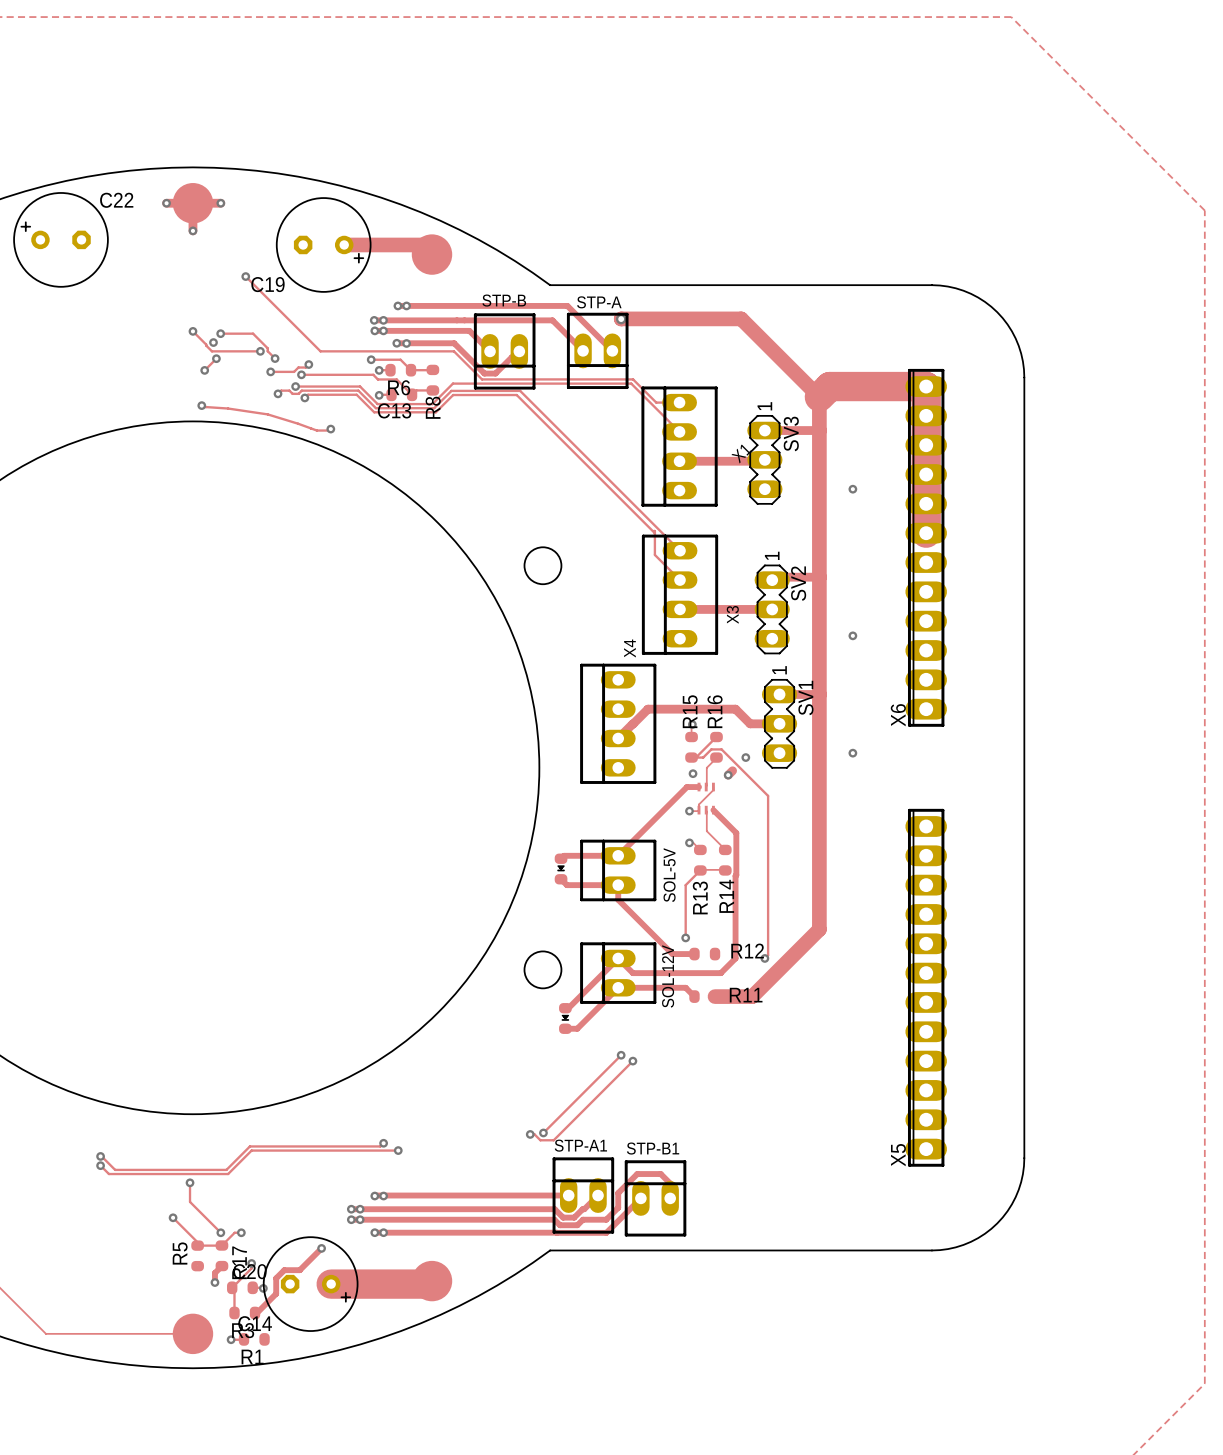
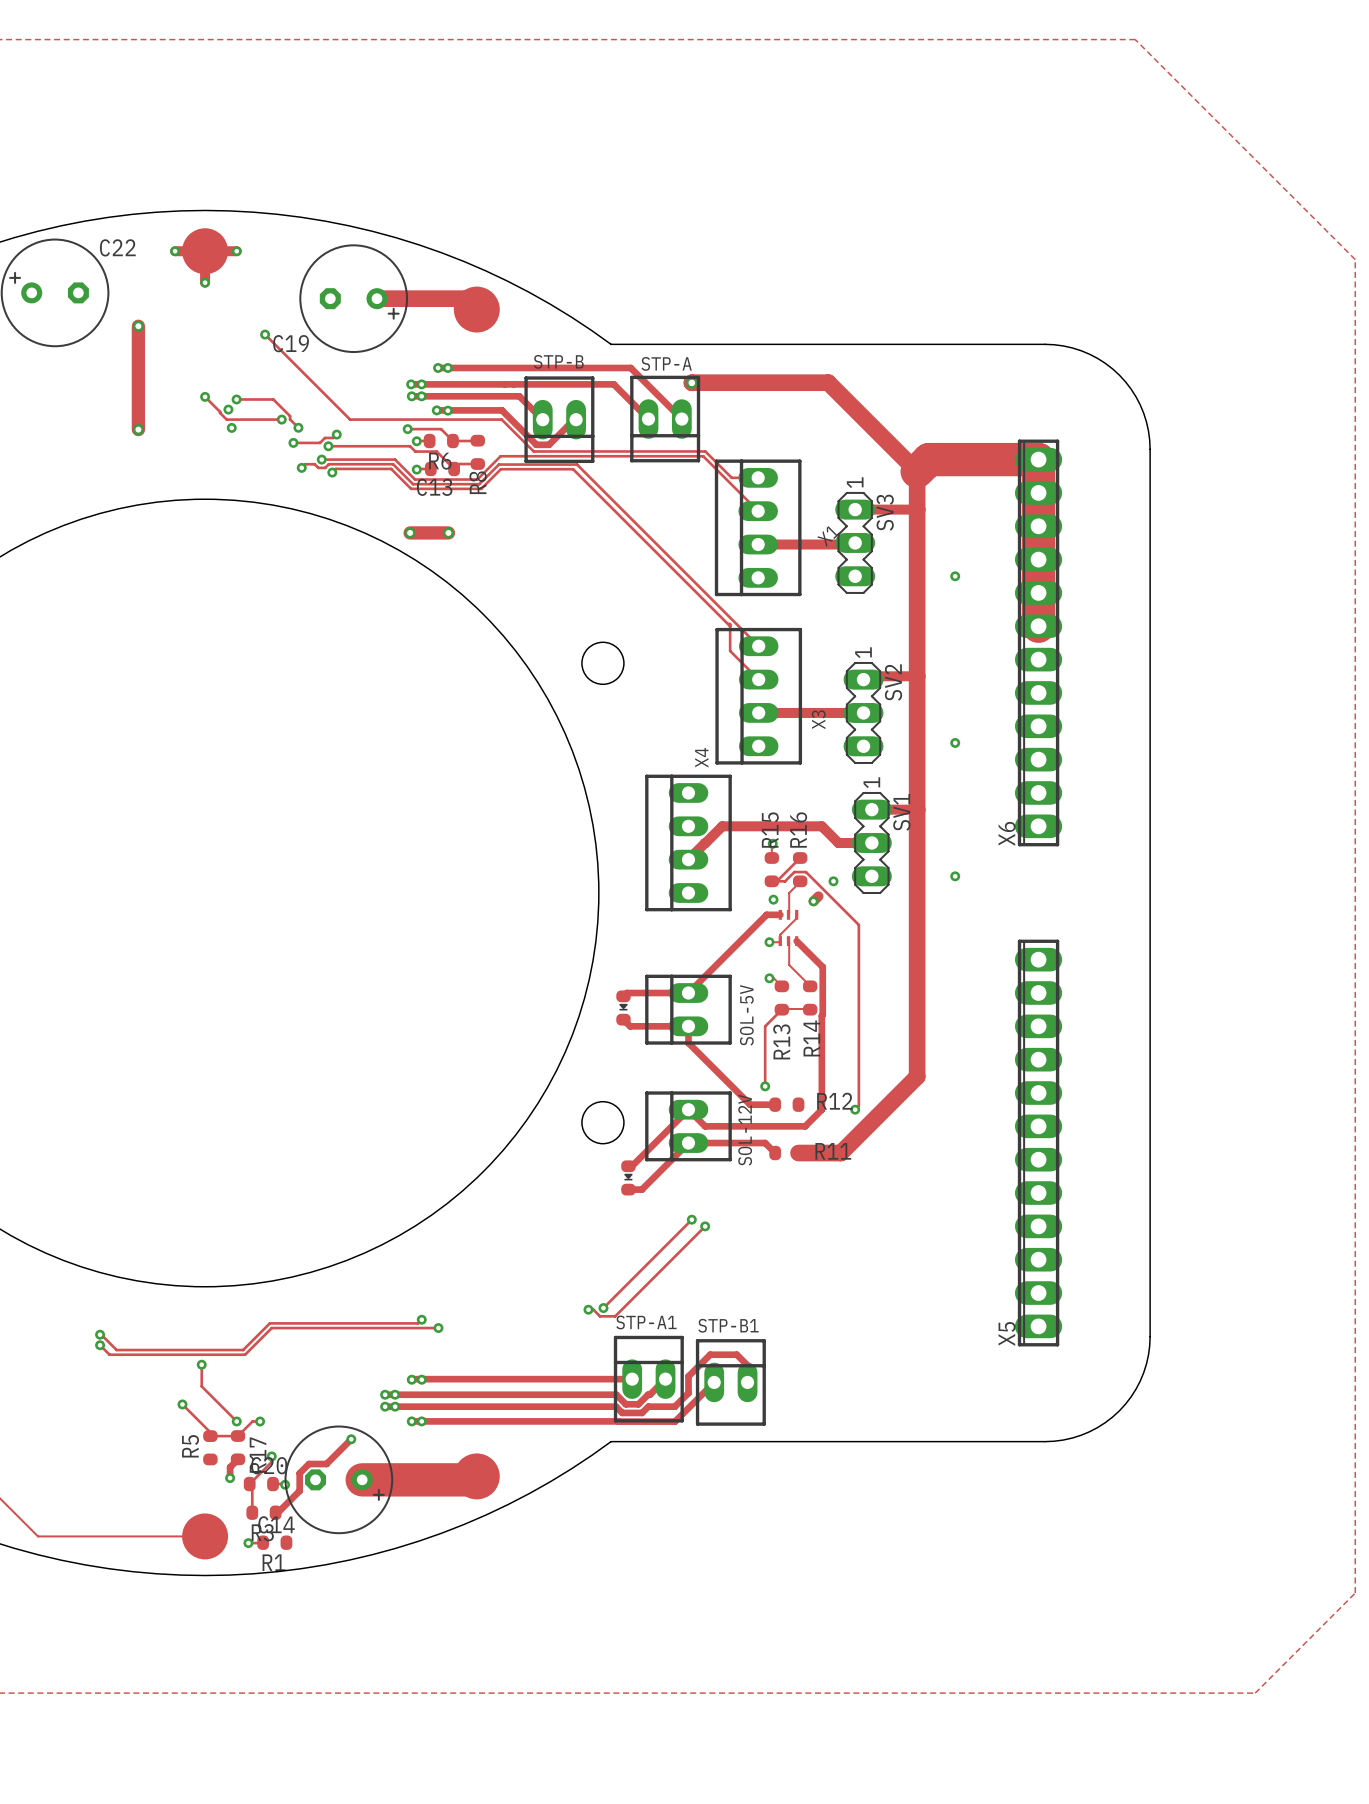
track: none -> (138, 326) (138, 429)
via: none -> (138, 326)
track: (216, 358) (204, 370) -> none
via: none -> (138, 429)
via: (204, 370) -> none
track: (201, 405) (267, 414) (316, 430) (330, 429) -> none
via: (201, 405) -> none
via: (330, 429) -> none
track: none -> (410, 532) (448, 532)
via: none -> (410, 532)
via: none -> (448, 532)

